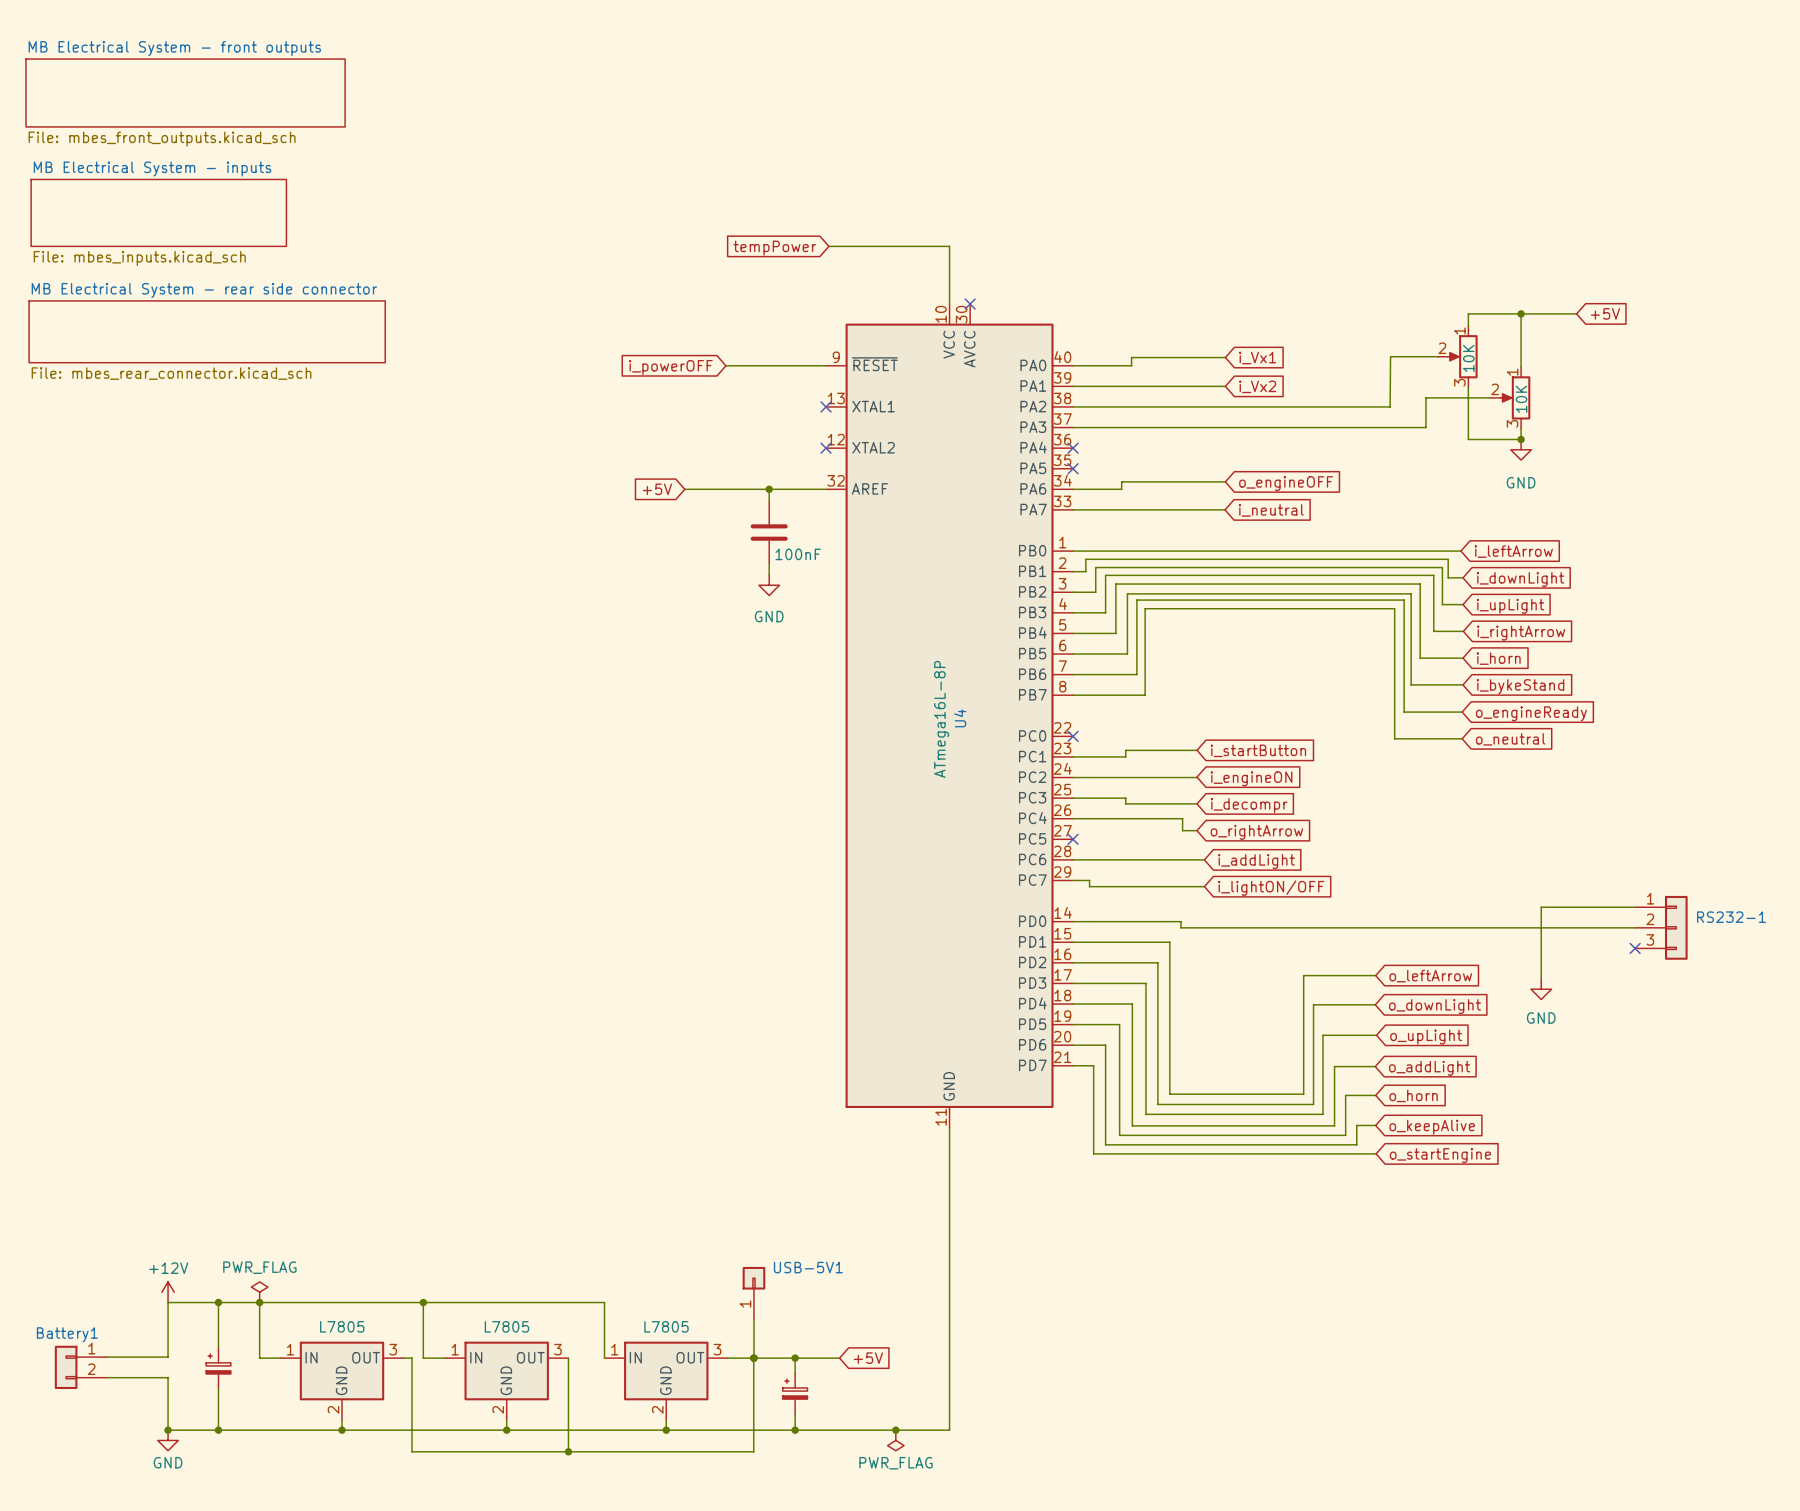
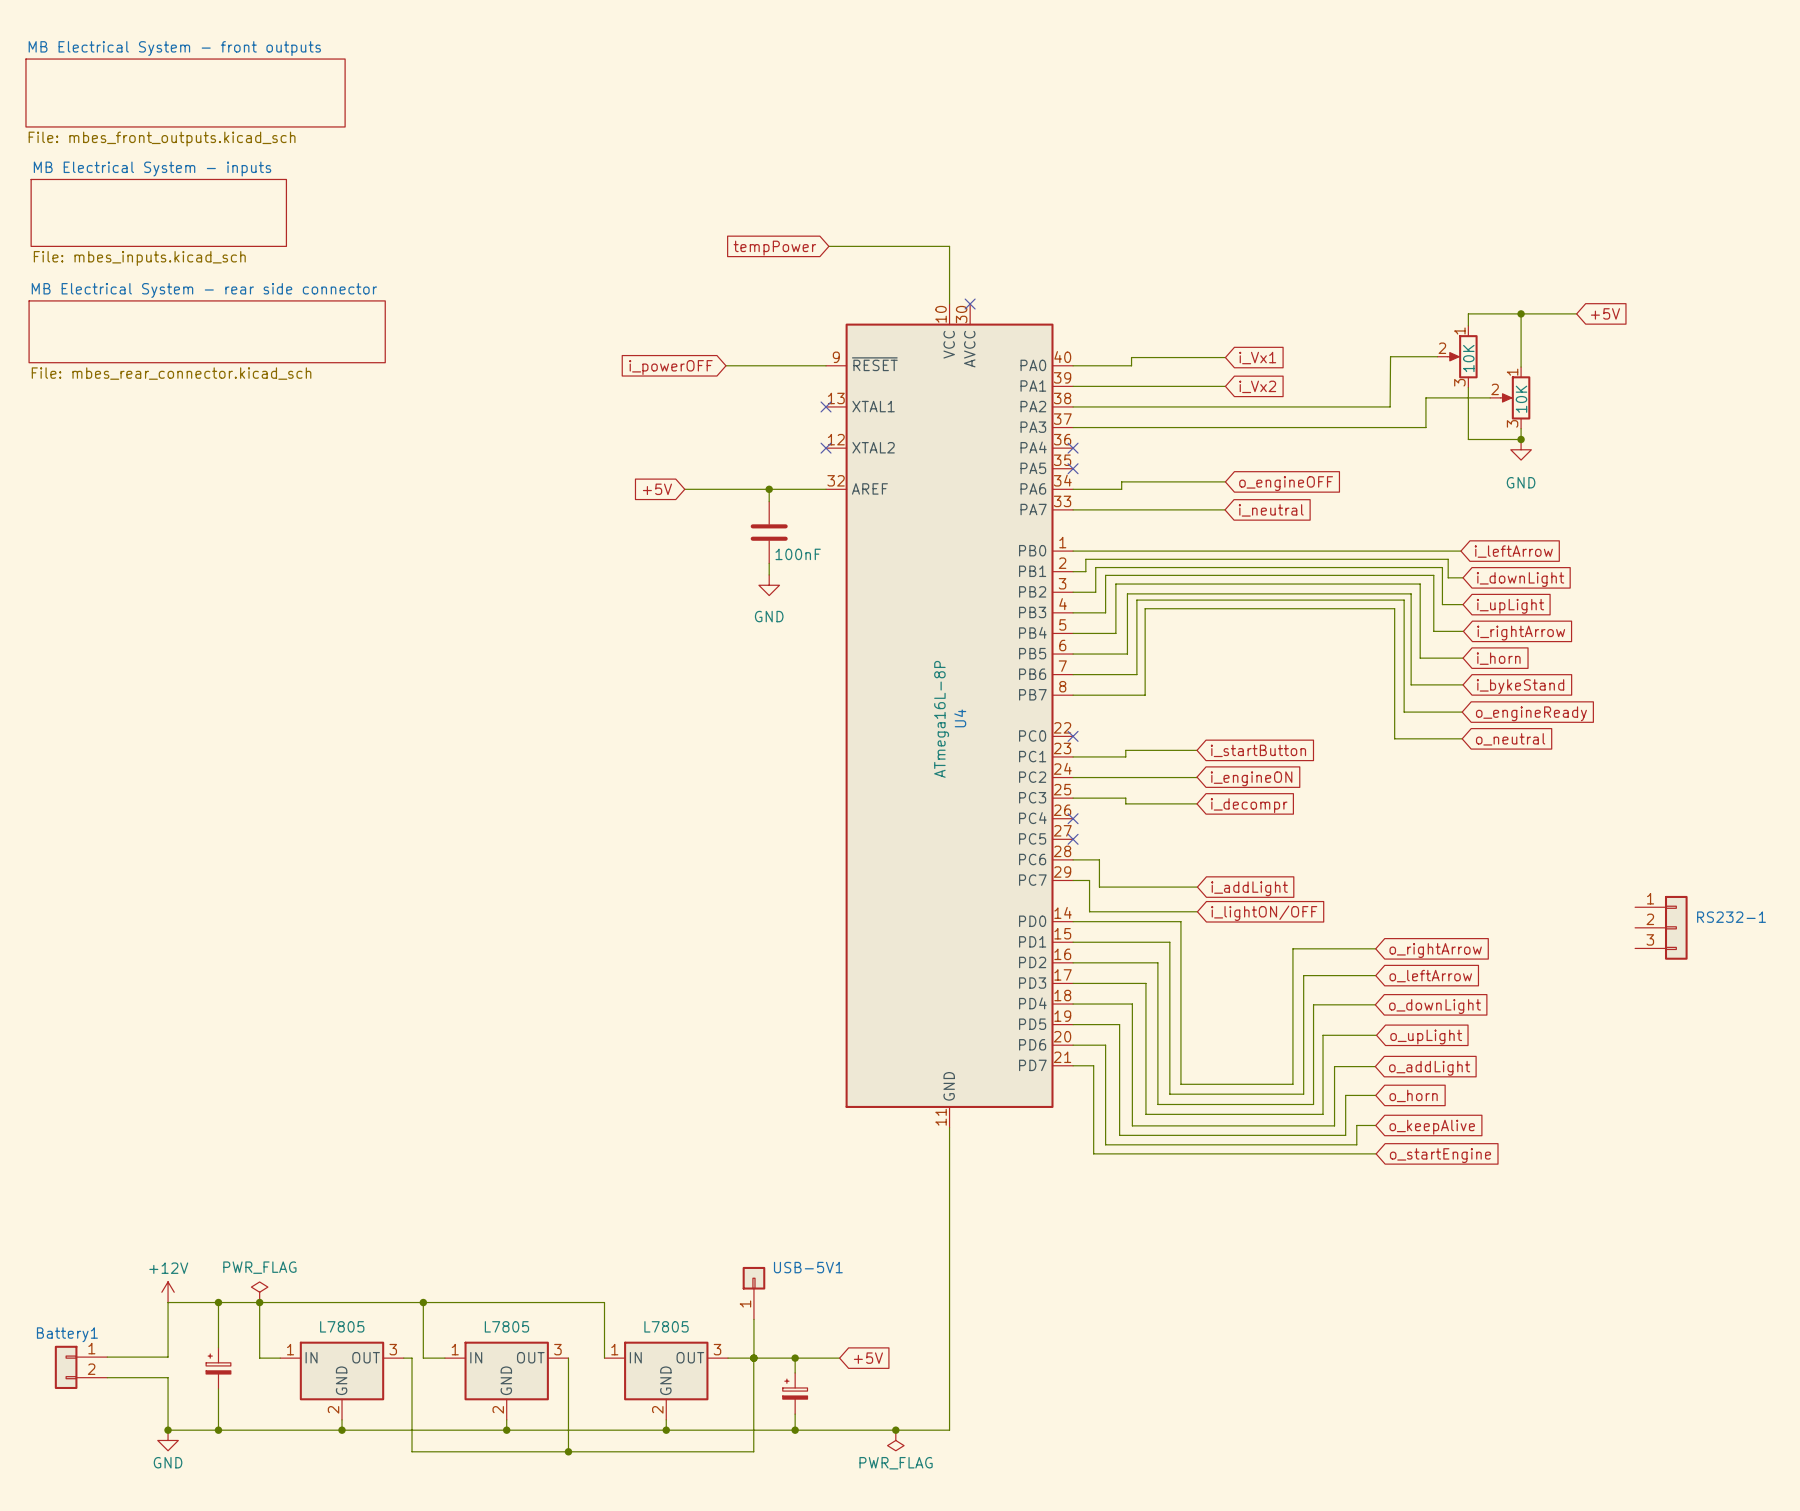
wire: (1073, 818) (1182, 818) (1182, 830) (1197, 830) -> none
no-connect mark: none -> (1073, 818)
global label: o_rightArrow (1256, 832) -> none
wire: (1099, 859) (1204, 859) -> (1099, 859) (1099, 887) (1197, 887)
global label position: i_addLight (1256, 861) -> i_addLight (1249, 888)
wire: (1089, 886) (1204, 886) -> (1089, 886) (1089, 911) (1197, 911)
global label position: i_lightON/OFF (1271, 888) -> i_lightON/OFF (1264, 913)
wire: (1635, 907) (1541, 907) (1541, 978) -> none
wire: (1180, 927) (1635, 927) -> (1180, 927) (1180, 1084) (1292, 1084) (1292, 948) (1375, 948)
no-connect mark: (1635, 948) -> none
global label: none -> o_rightArrow (1435, 950)
power symbol: GND (1541, 989) -> none

